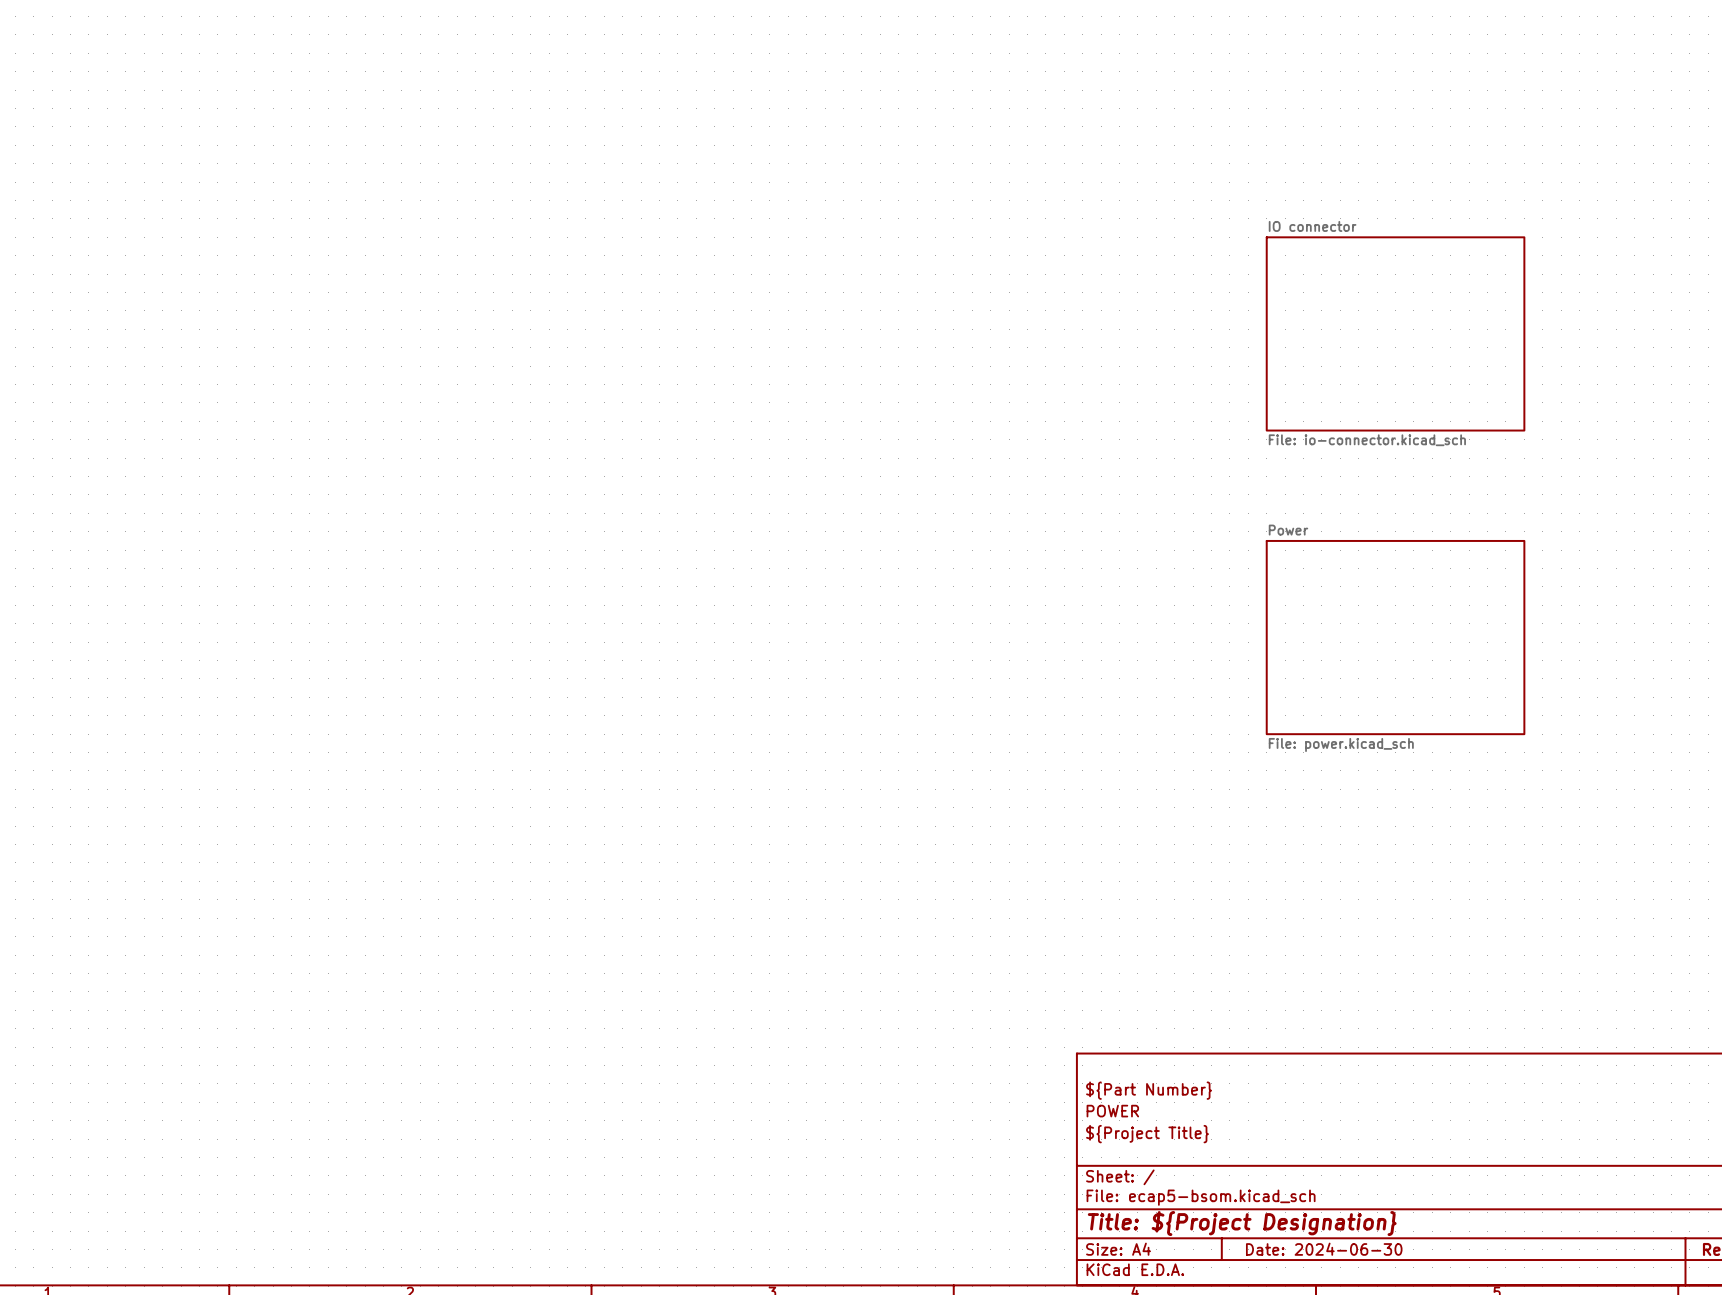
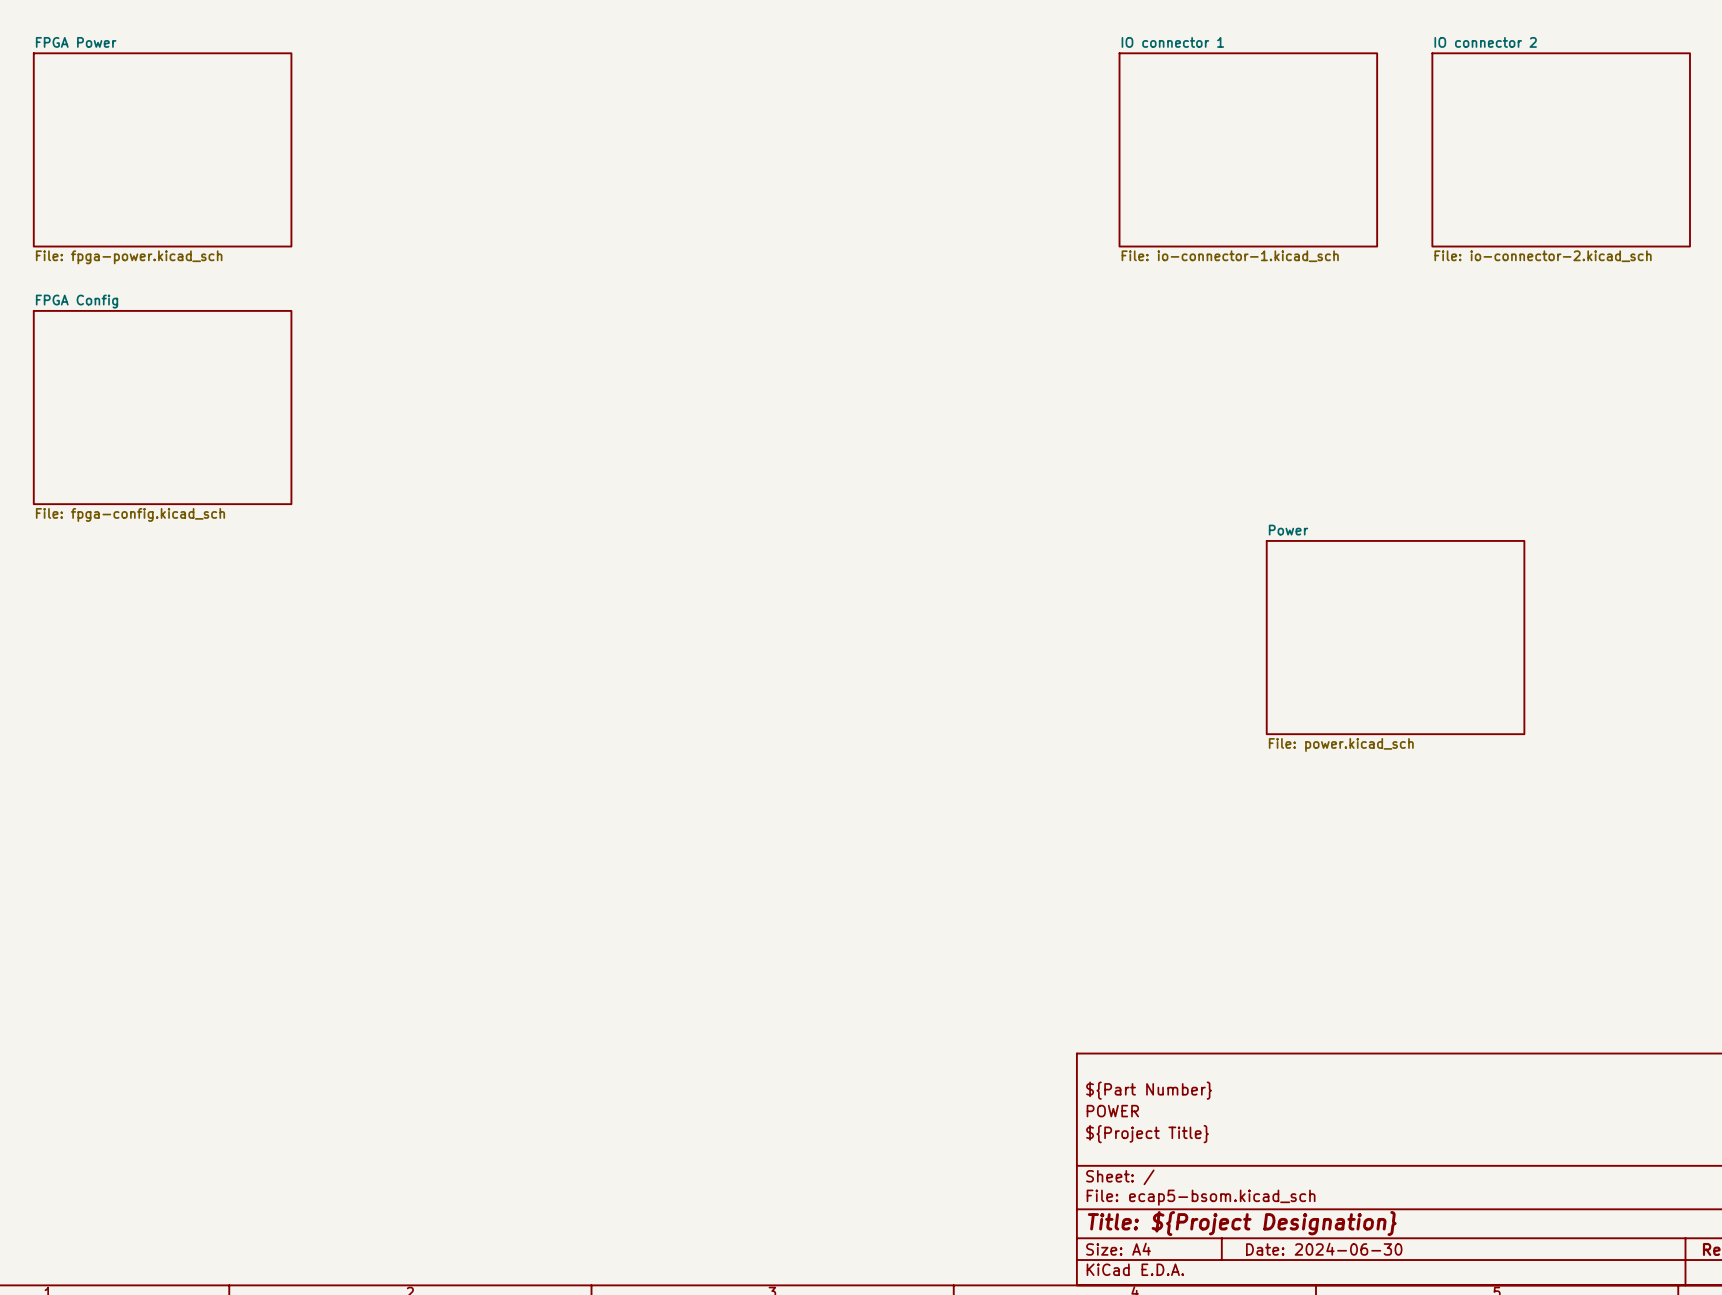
sheet FPGA Power: none -> File: fpga-power.kicad_sch (162, 149)
sheet IO connector 1: none -> File: io-connector-1.kicad_sch (1248, 149)
sheet IO connector 2: none -> File: io-connector-2.kicad_sch (1561, 149)
sheet IO connector: File: io-connector.kicad_sch (1395, 333) -> none
sheet FPGA Config: none -> File: fpga-config.kicad_sch (162, 407)

